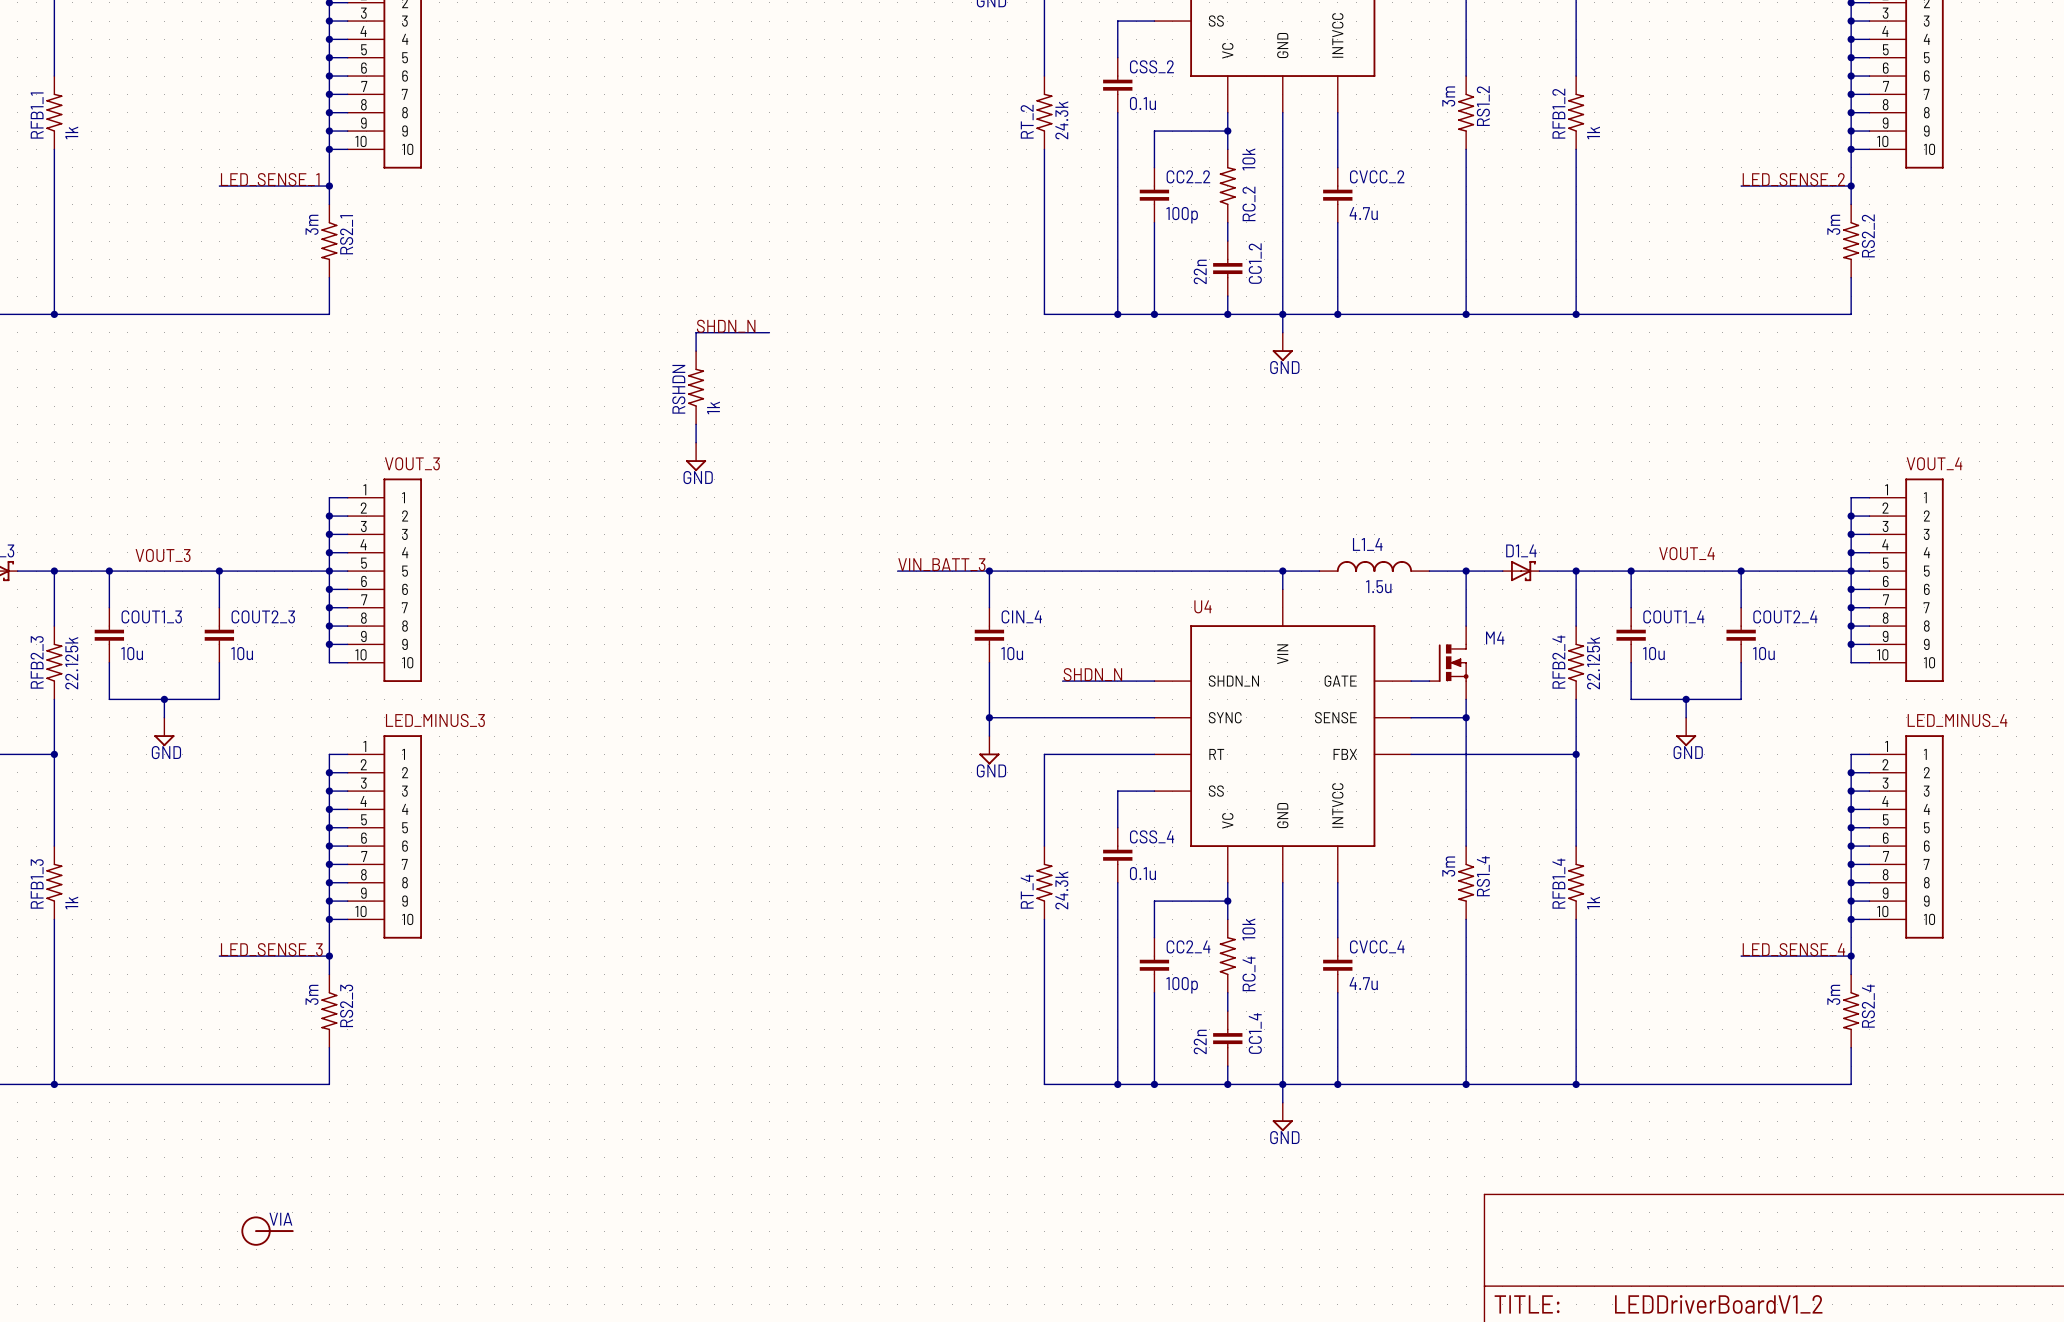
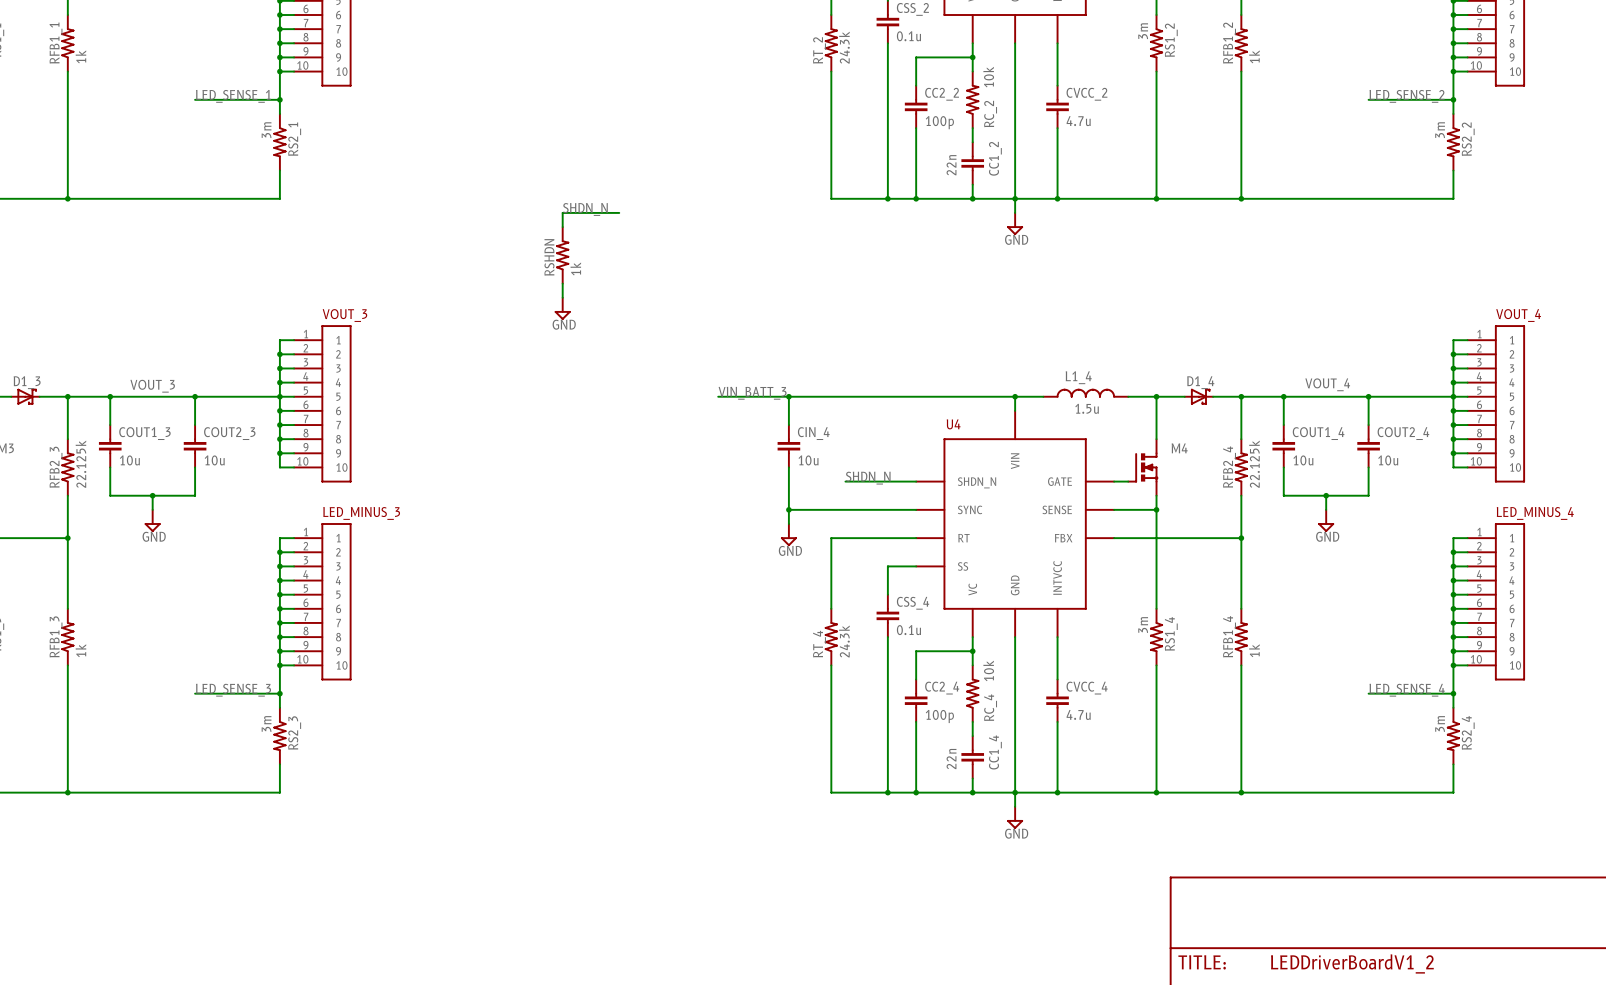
part: (267, 1231) -> none

